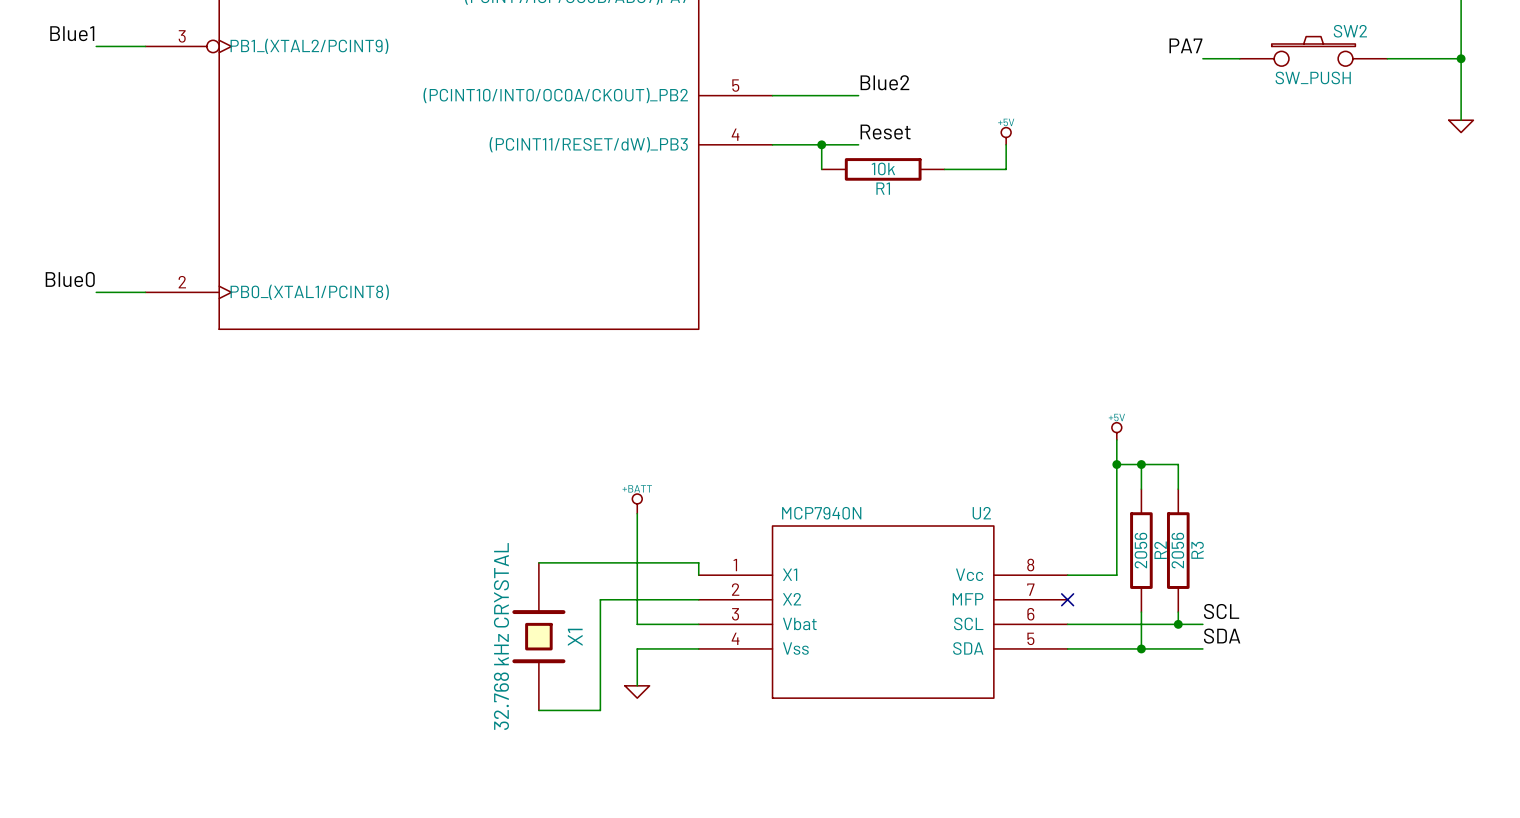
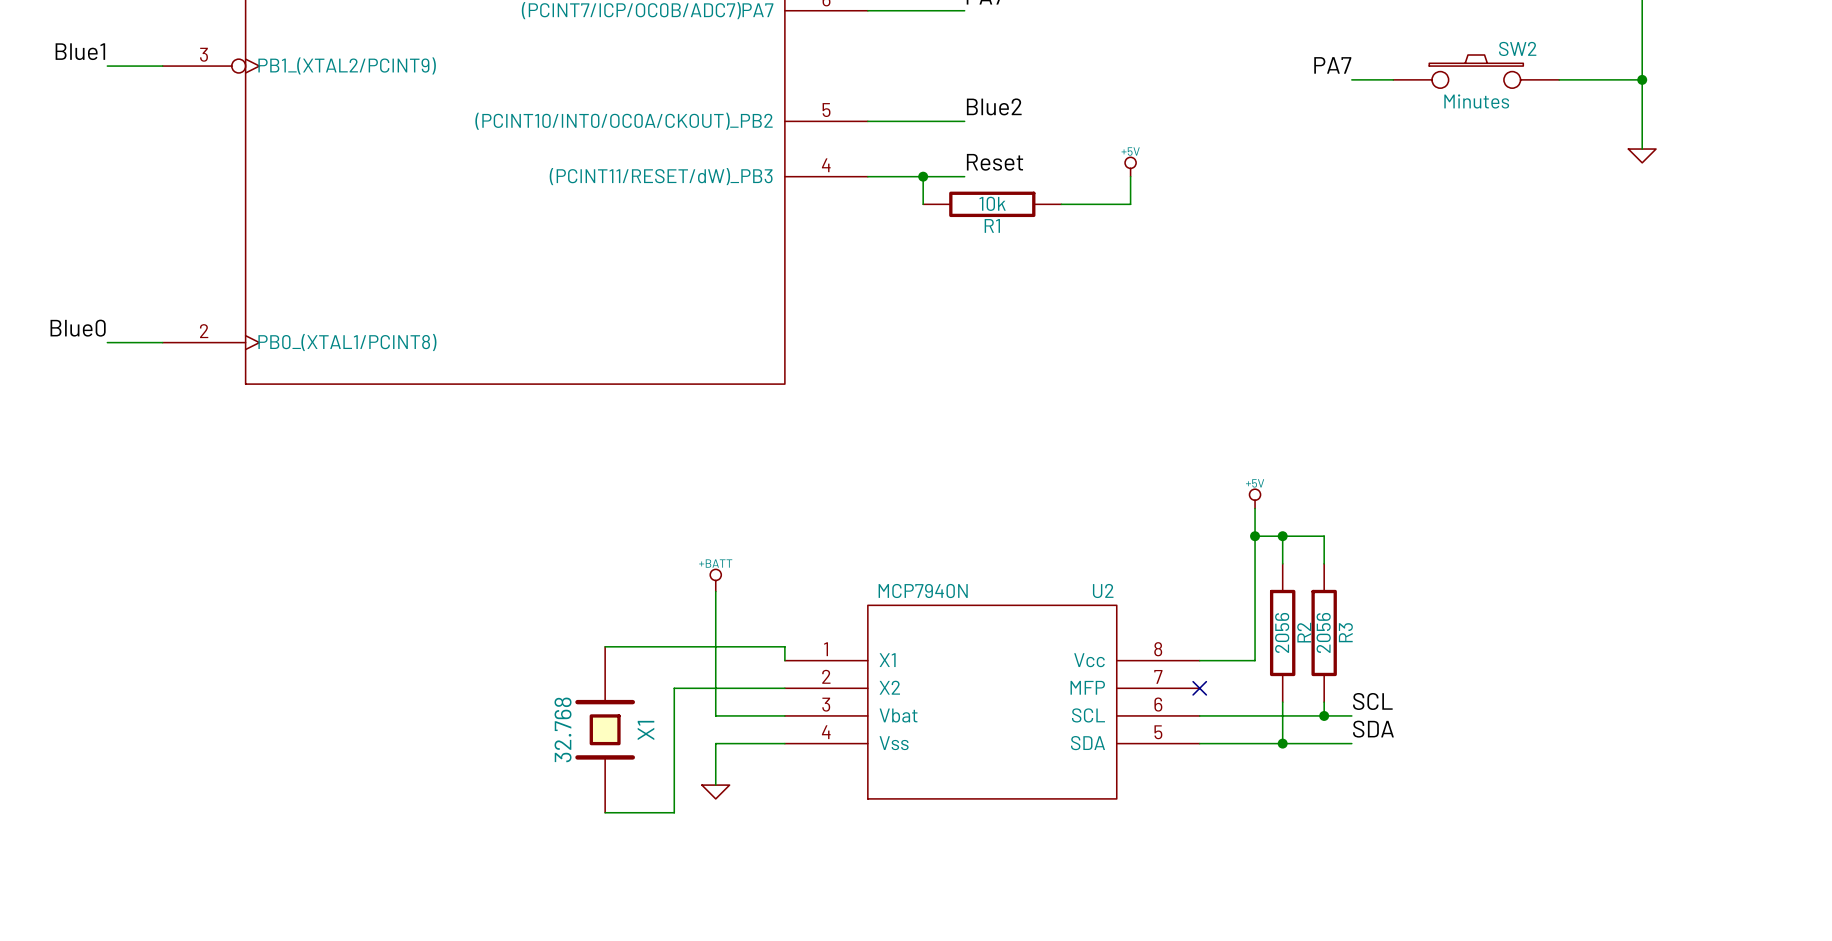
SW2 value: SW_PUSH (1313, 77) -> Minutes (1476, 101)
X1 value: 32.768 kHz CRYSTAL (501, 636) -> 32.768 (563, 729)

